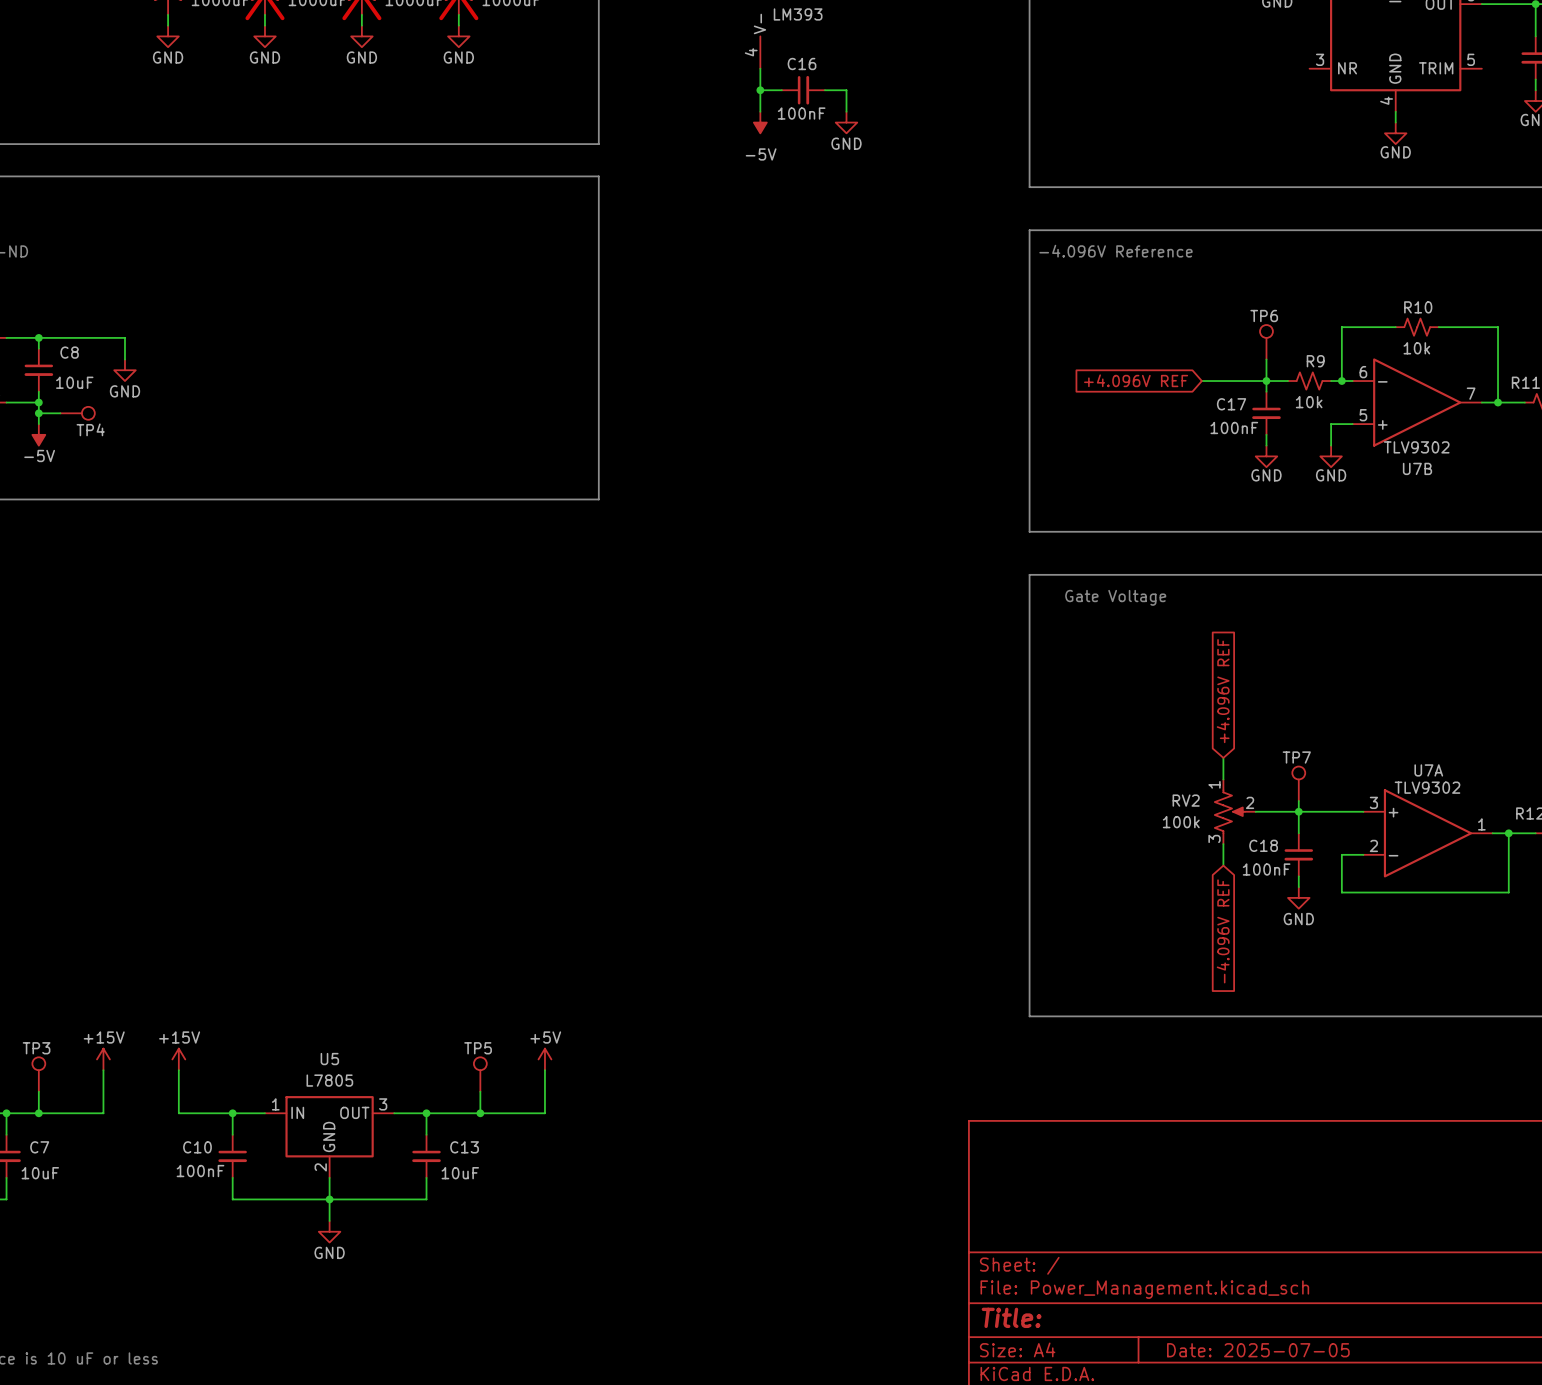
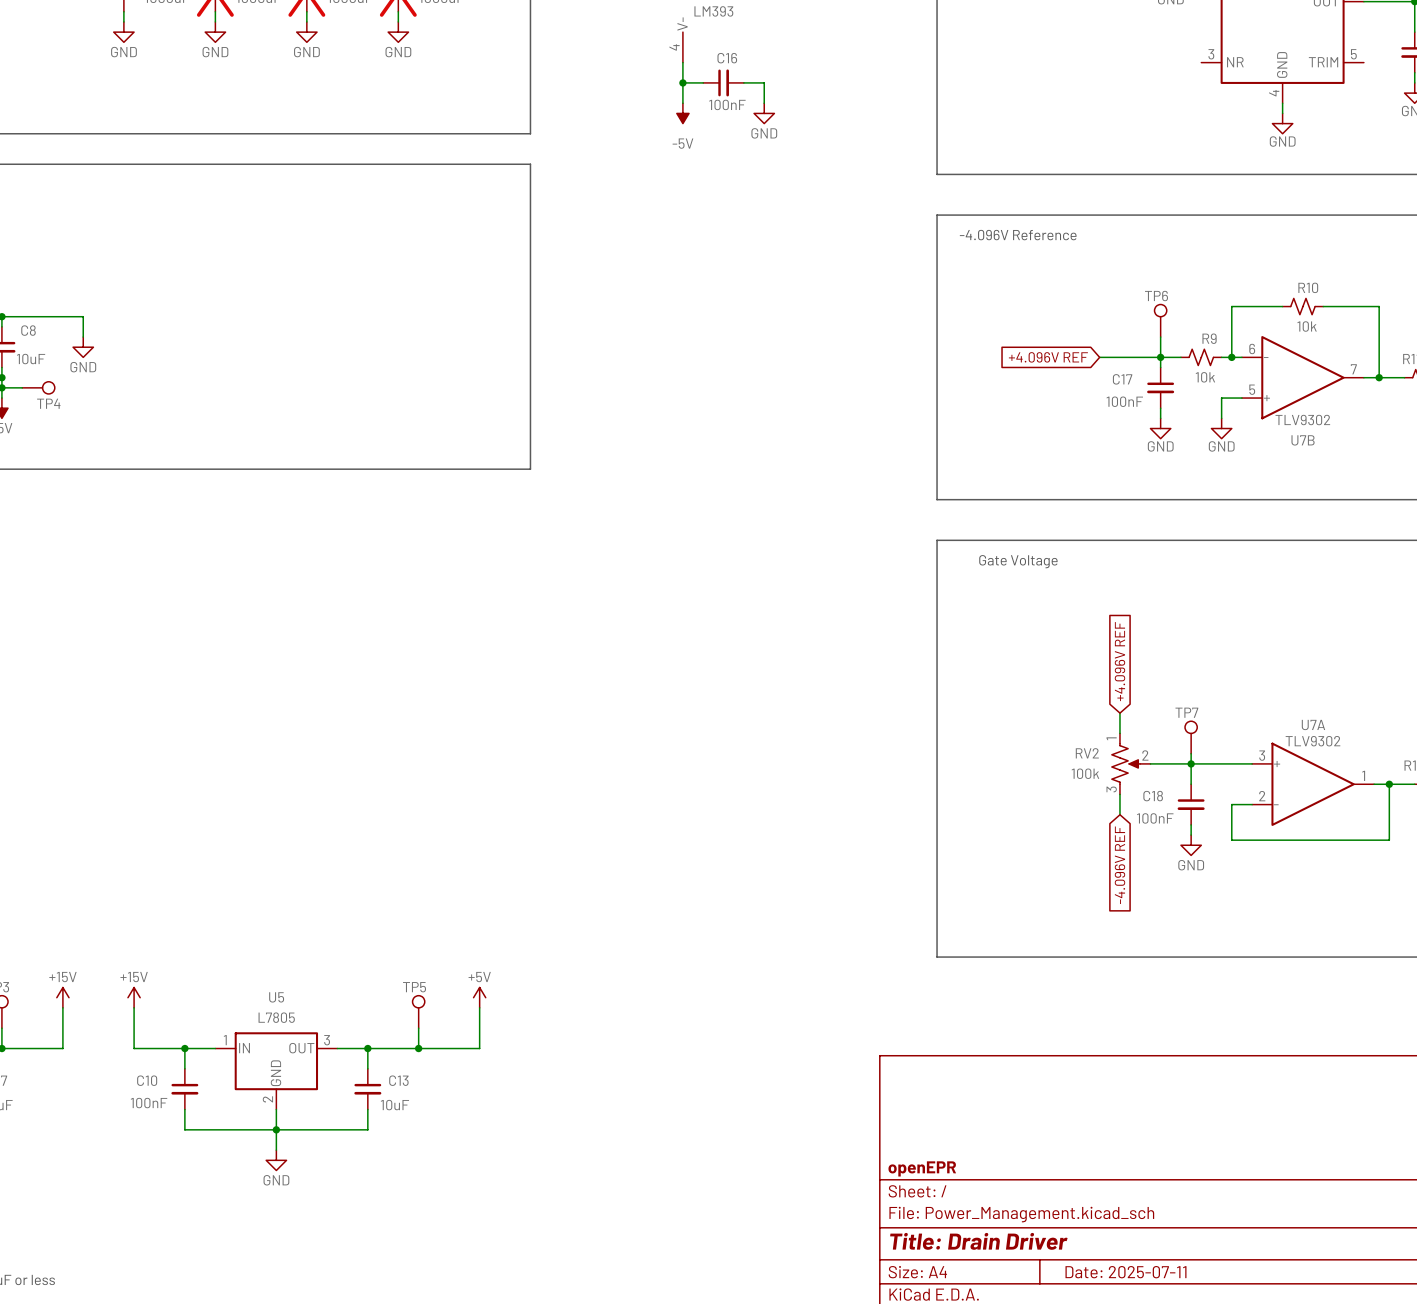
title block: none -> openEPR (922, 1168)
title block: Title: (1011, 1317) -> Title: Drain Driver (978, 1241)
title block: Date: 2025-07-05 (1258, 1350) -> Date: 2025-07-11 (1125, 1272)

